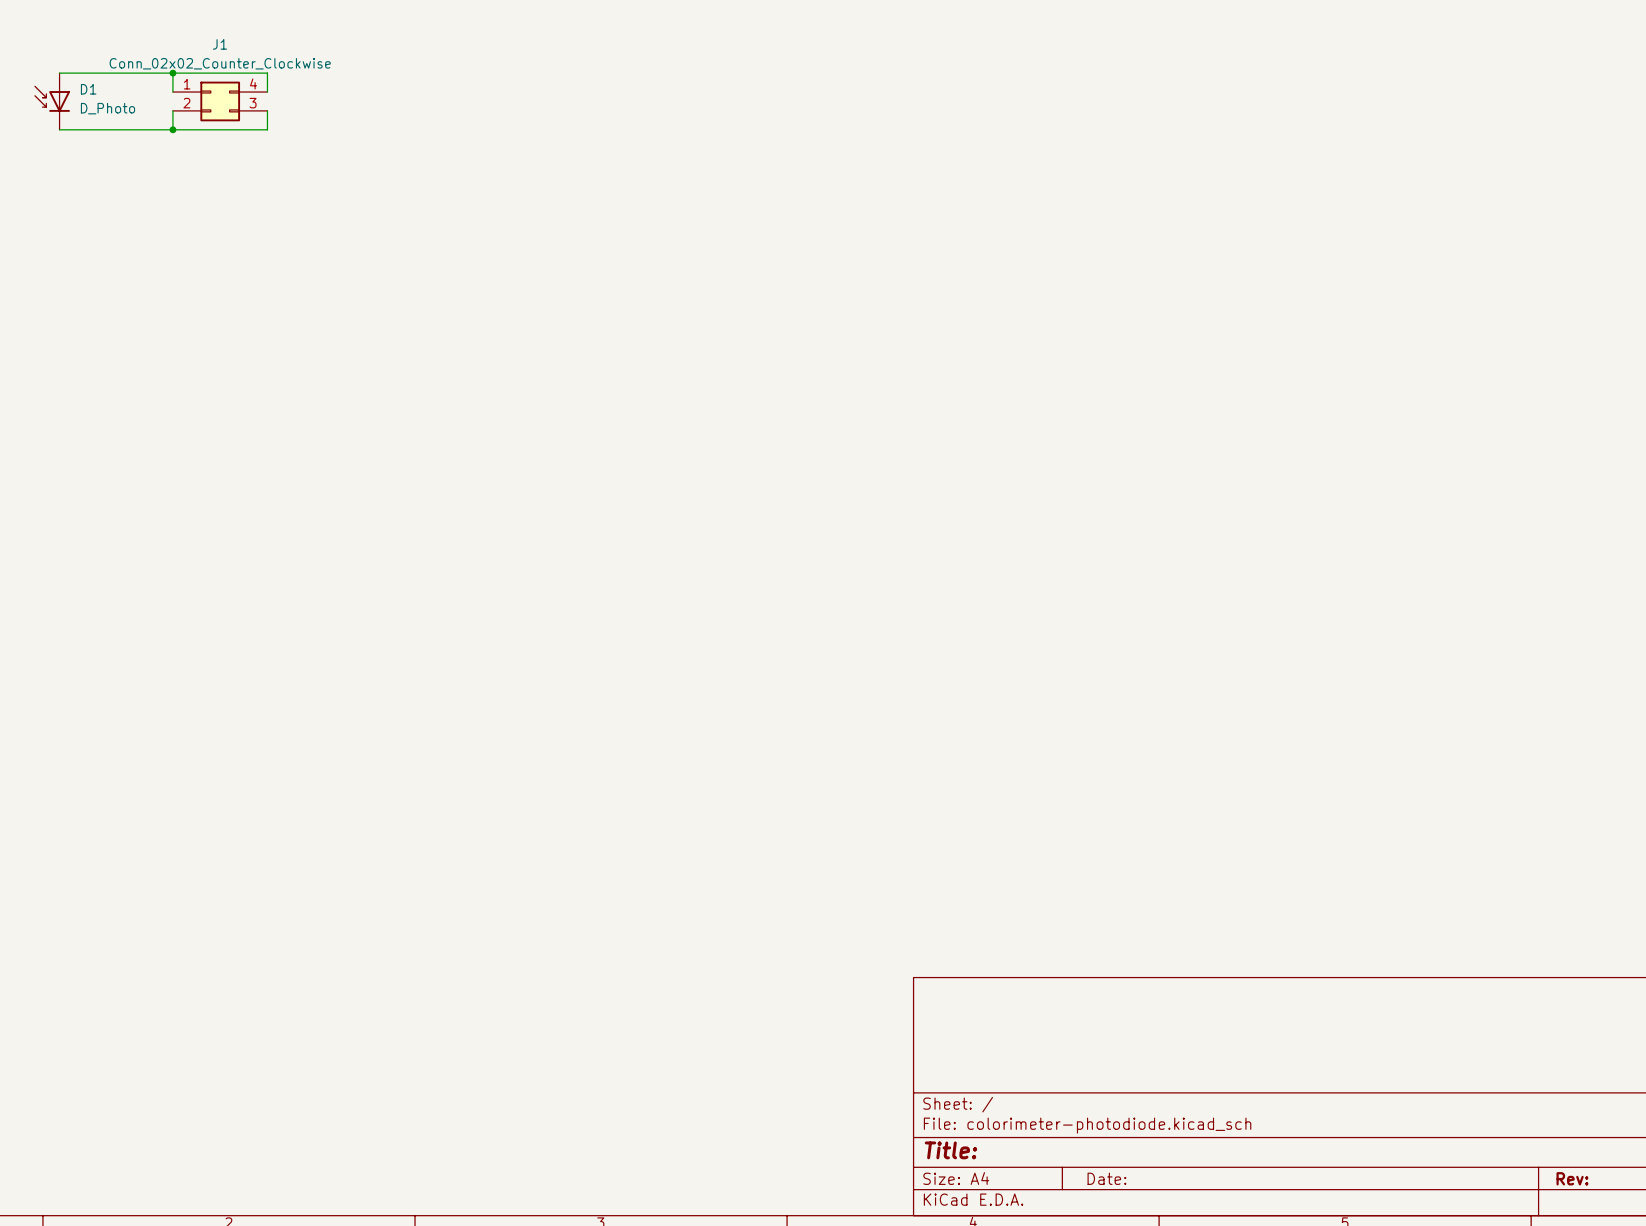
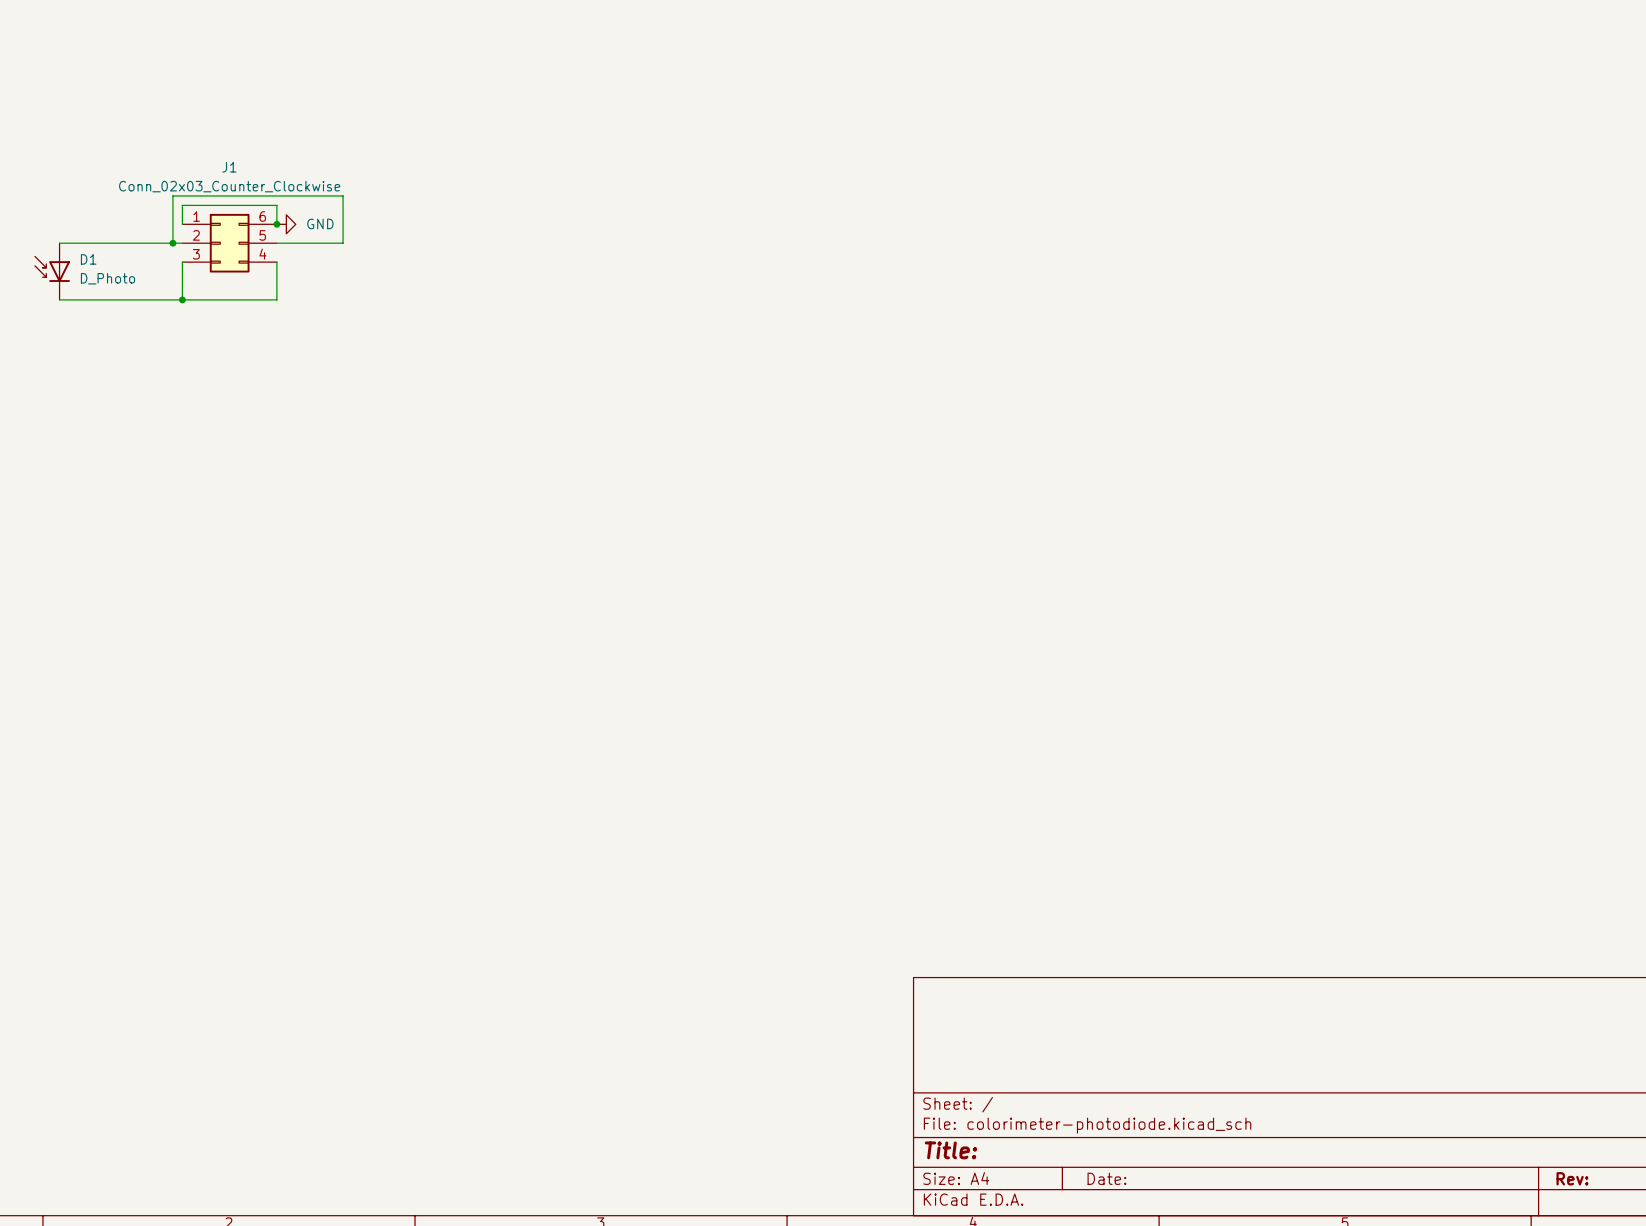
J1 name position: J1 (219, 44) -> J1 (229, 167)
J1 value: Conn_02x02_Counter_Clockwise (220, 63) -> Conn_02x03_Counter_Clockwise (229, 186)
wire: (59, 73) (267, 73) (267, 92) -> none
wire: (172, 73) (172, 92) -> none
junction: (172, 73) -> none
J1 symbol: [172, 81, 268, 122] -> [182, 213, 277, 273]
D1 position: (52, 101) -> (52, 271)
wire: (172, 110) (172, 129) -> none
wire: (267, 110) (267, 129) (59, 129) -> none
junction: (172, 129) -> none
wire: none -> (182, 224) (182, 205) (276, 205) (276, 224)
junction: none -> (276, 224)
power symbol: none -> GND (286, 224)
wire: none -> (59, 243) (182, 243)
wire: none -> (172, 243) (172, 195) (343, 195) (343, 243) (276, 243)
junction: none -> (172, 243)
wire: none -> (182, 262) (182, 299)
wire: none -> (276, 262) (276, 299) (59, 299)
junction: none -> (182, 299)

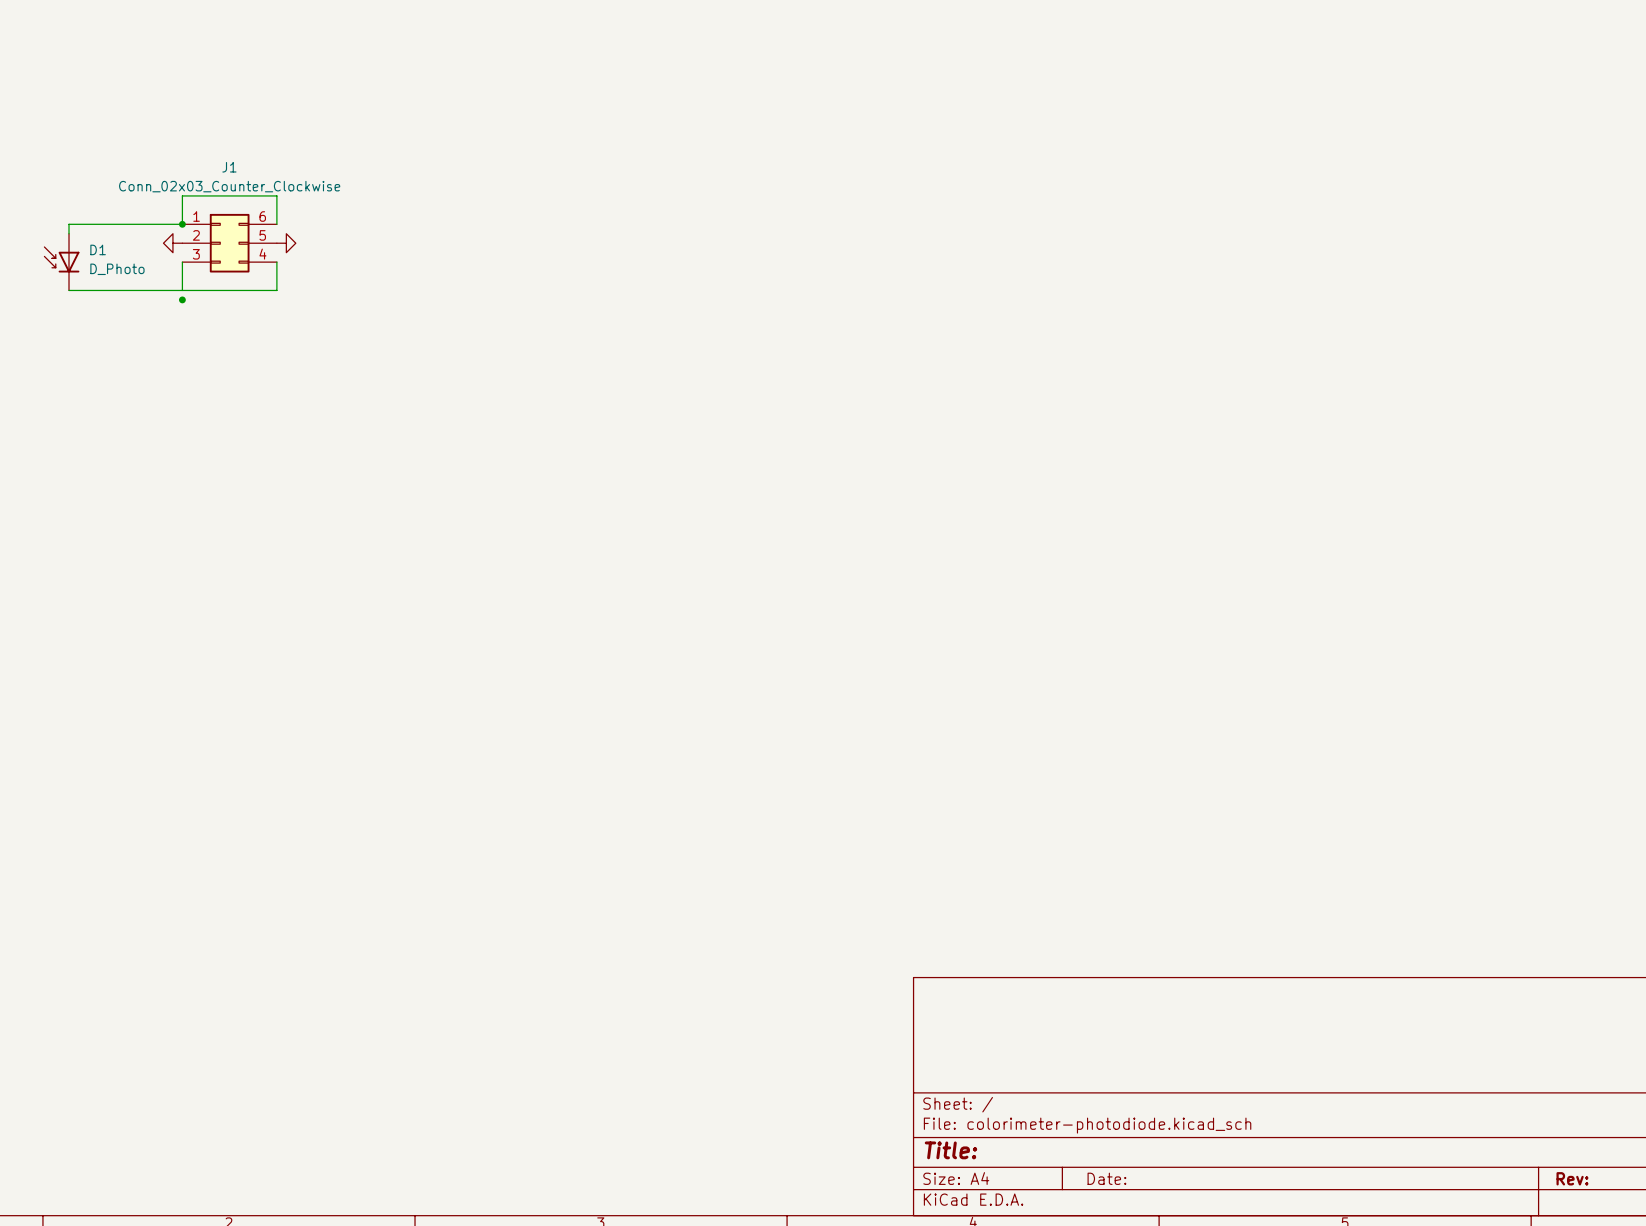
wire: (182, 195) (172, 195) (172, 243) -> (182, 195) (182, 205)
wire: (276, 195) (343, 195) (343, 243) (276, 243) -> (276, 195) (276, 205)
wire: (182, 205) (276, 205) -> none
wire: none -> (182, 224) (69, 224) (69, 233)
junction: (276, 224) -> none
power symbol: GND (286, 224) -> none
wire: (59, 243) (182, 243) -> none
junction position: (172, 243) -> (182, 224)
power symbol: none -> (172, 243)
power symbol: none -> (286, 243)
D1 position: (52, 271) -> (61, 262)
wire: (182, 290) (182, 299) -> none
wire: (276, 290) (276, 299) (59, 299) -> (276, 290) (69, 290)

